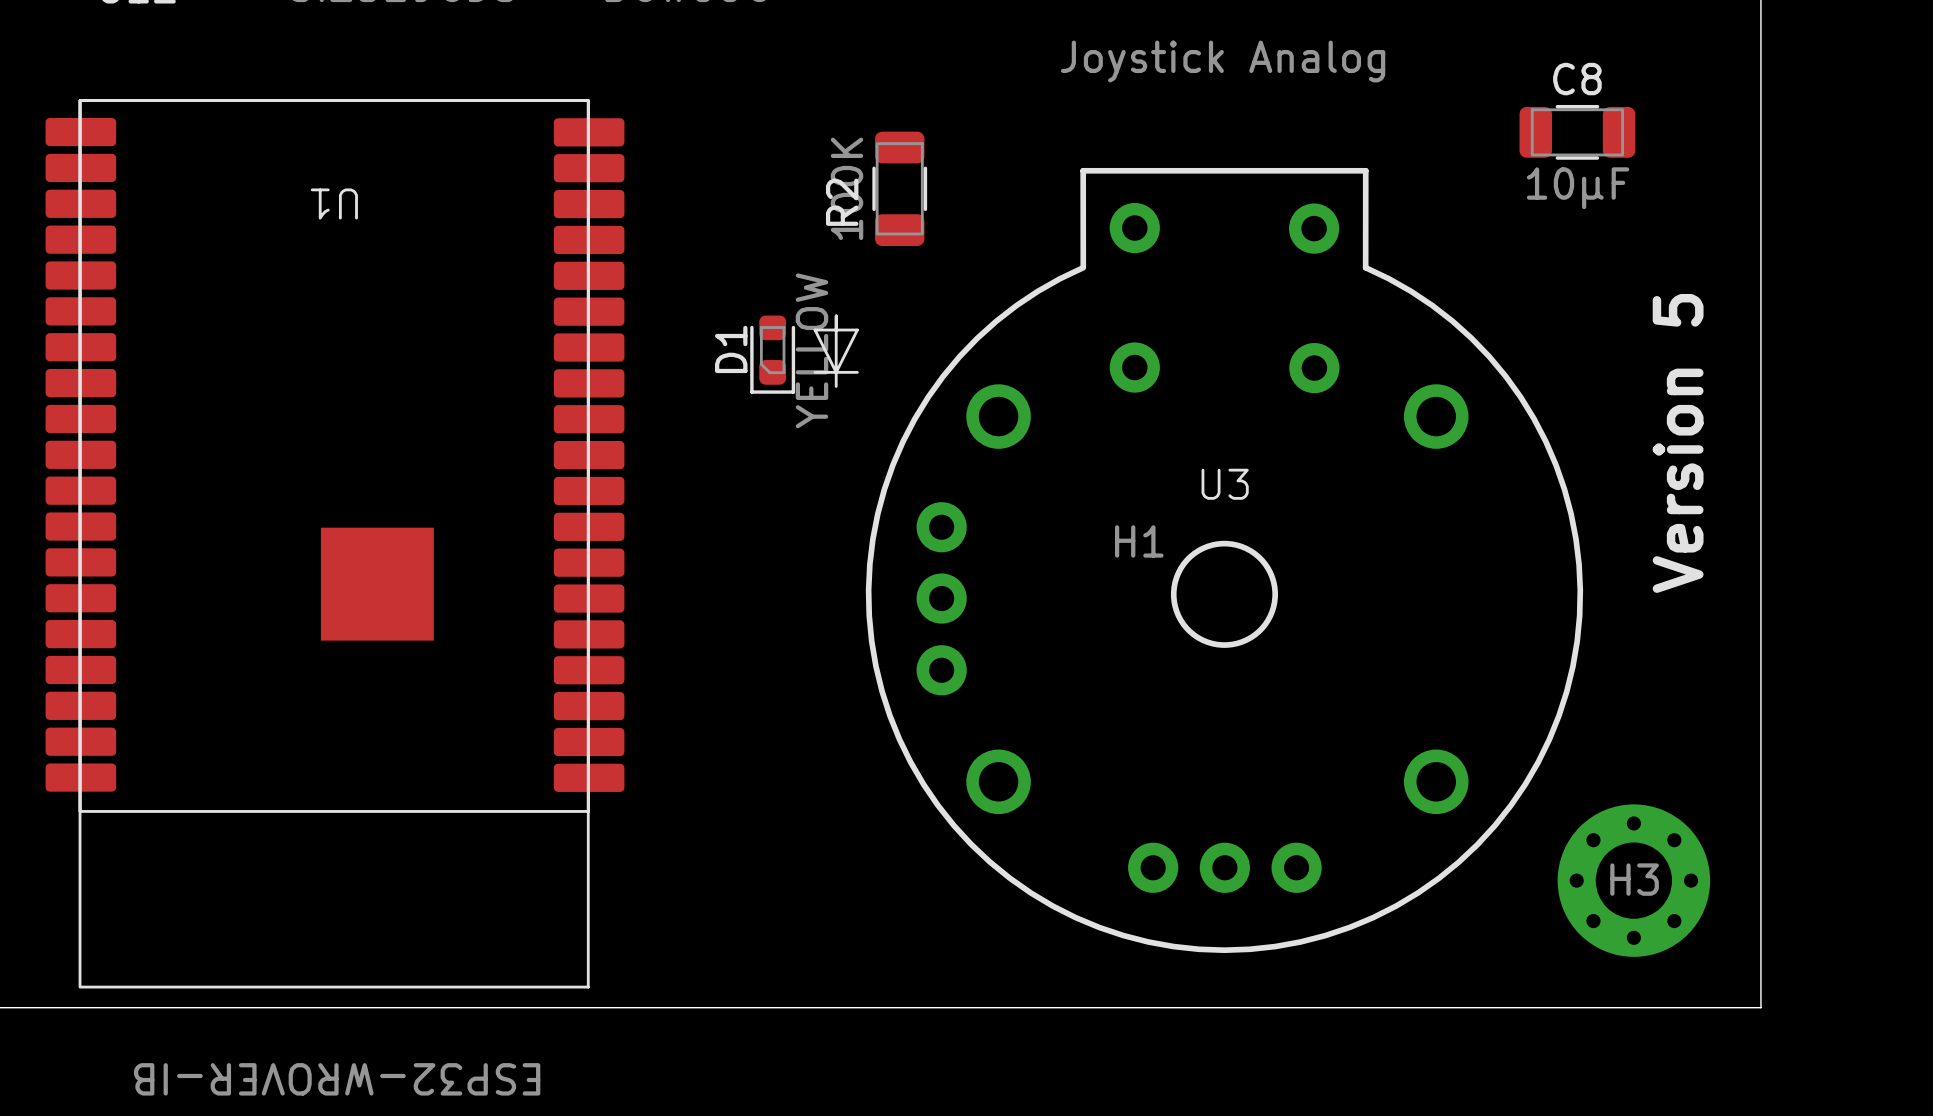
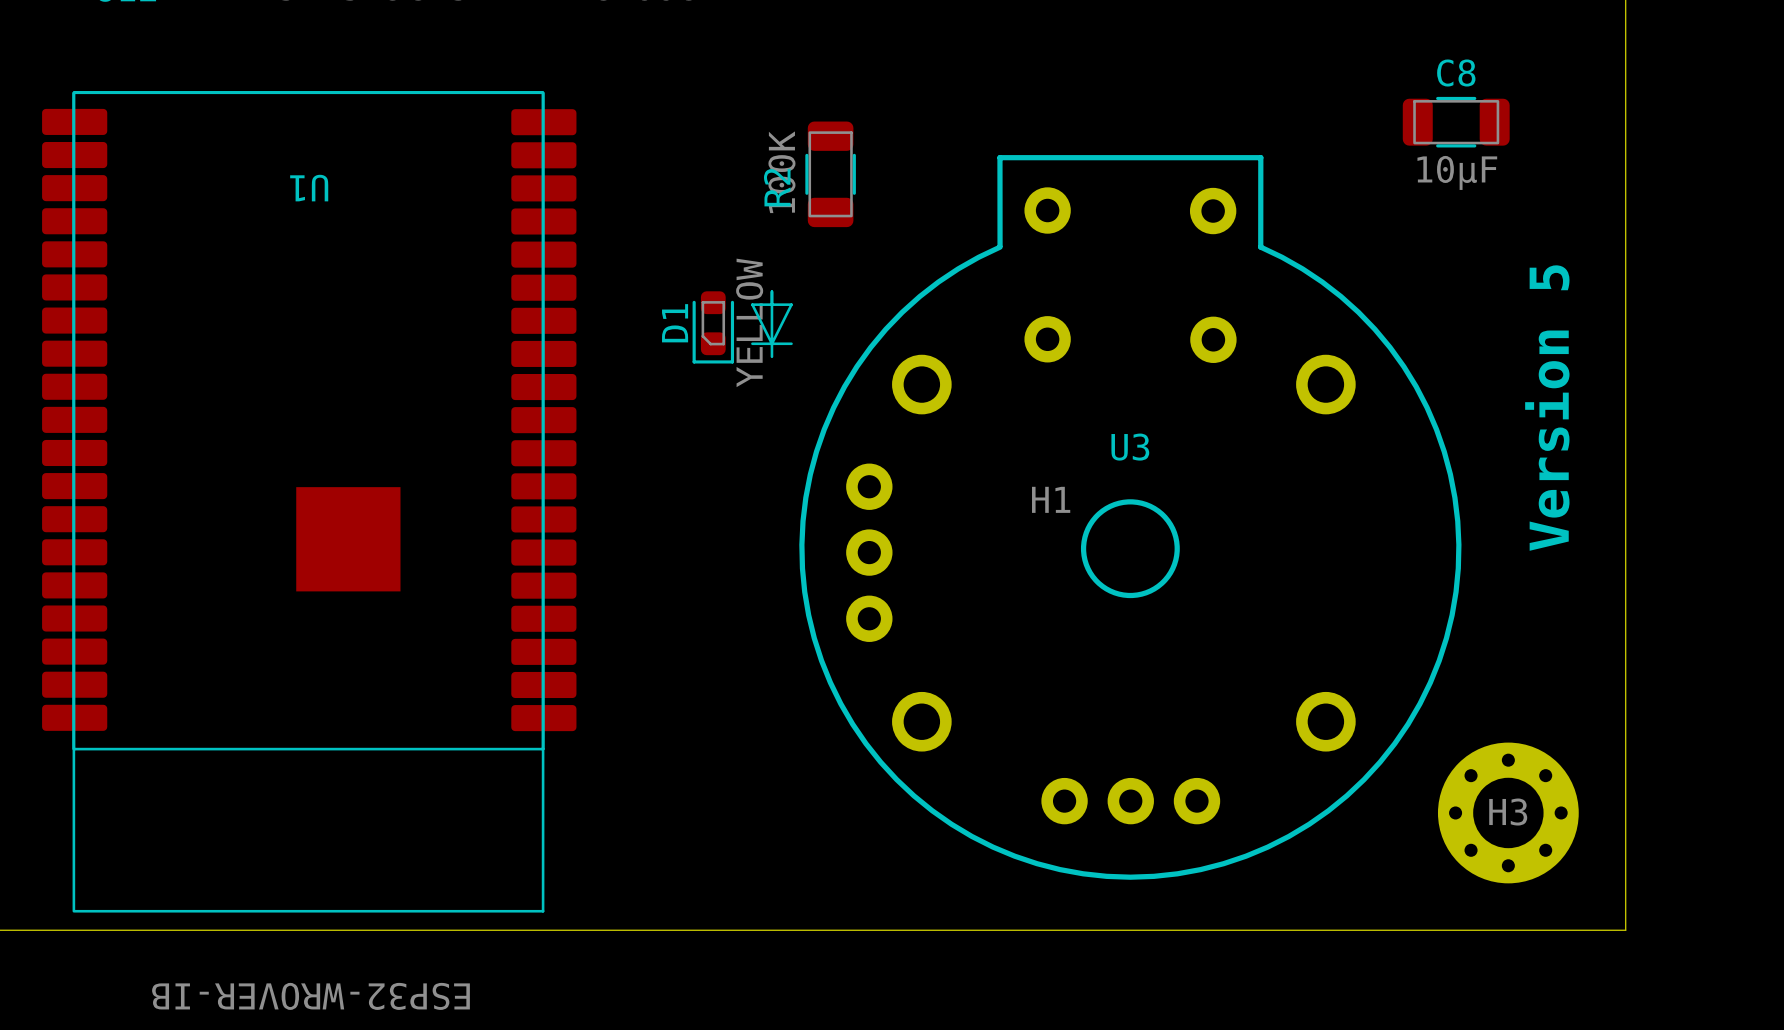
U3 value: Joystick Analog (1223, 61) -> none

